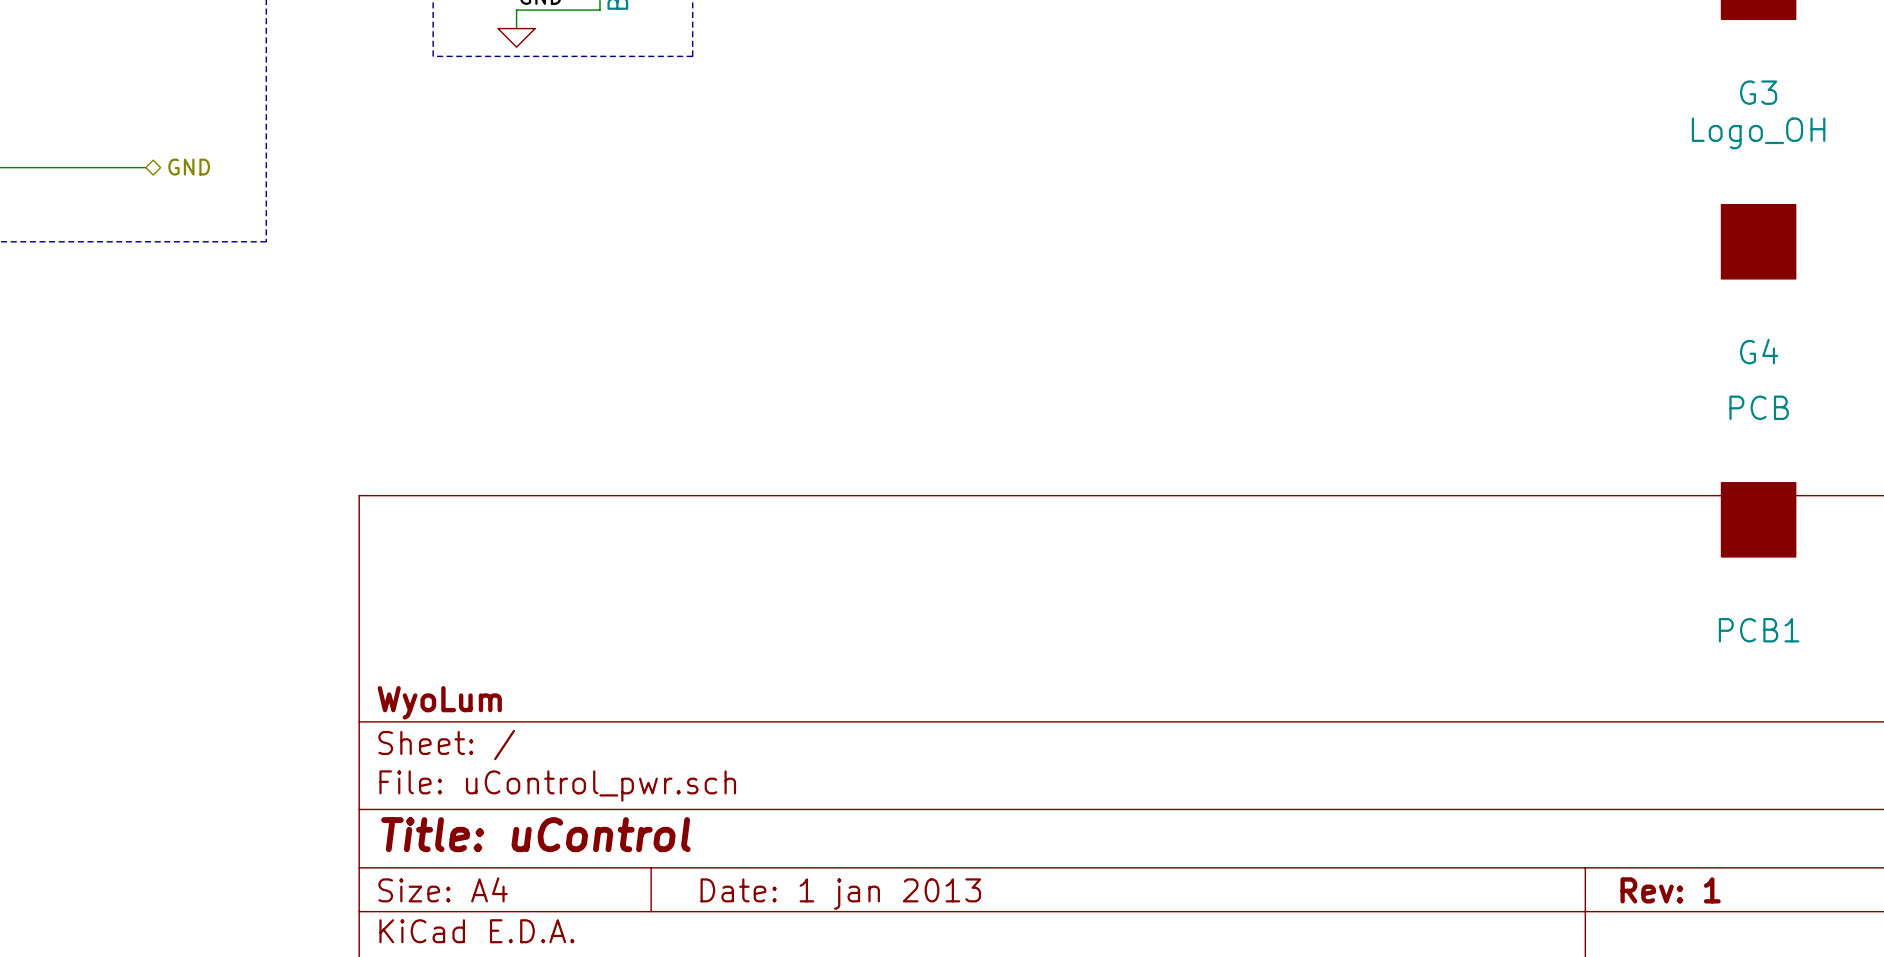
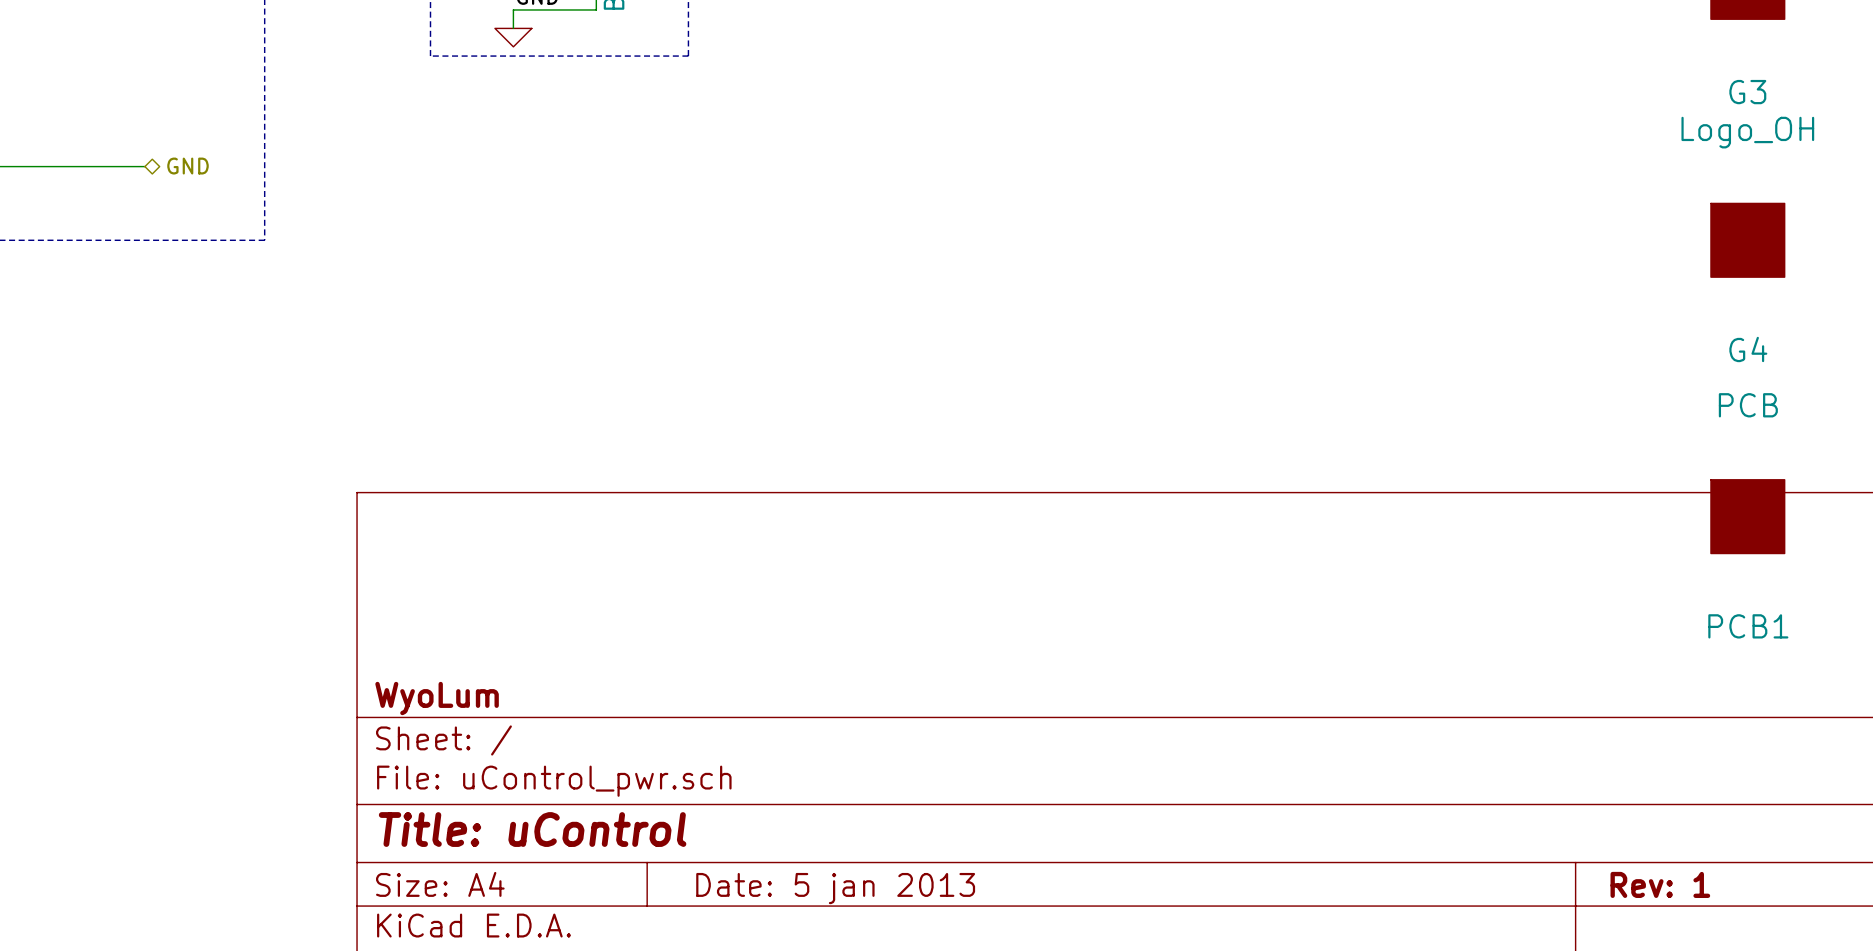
title block: Date: 1 jan 2013 (840, 894) -> Date: 5 jan 2013 (835, 888)

